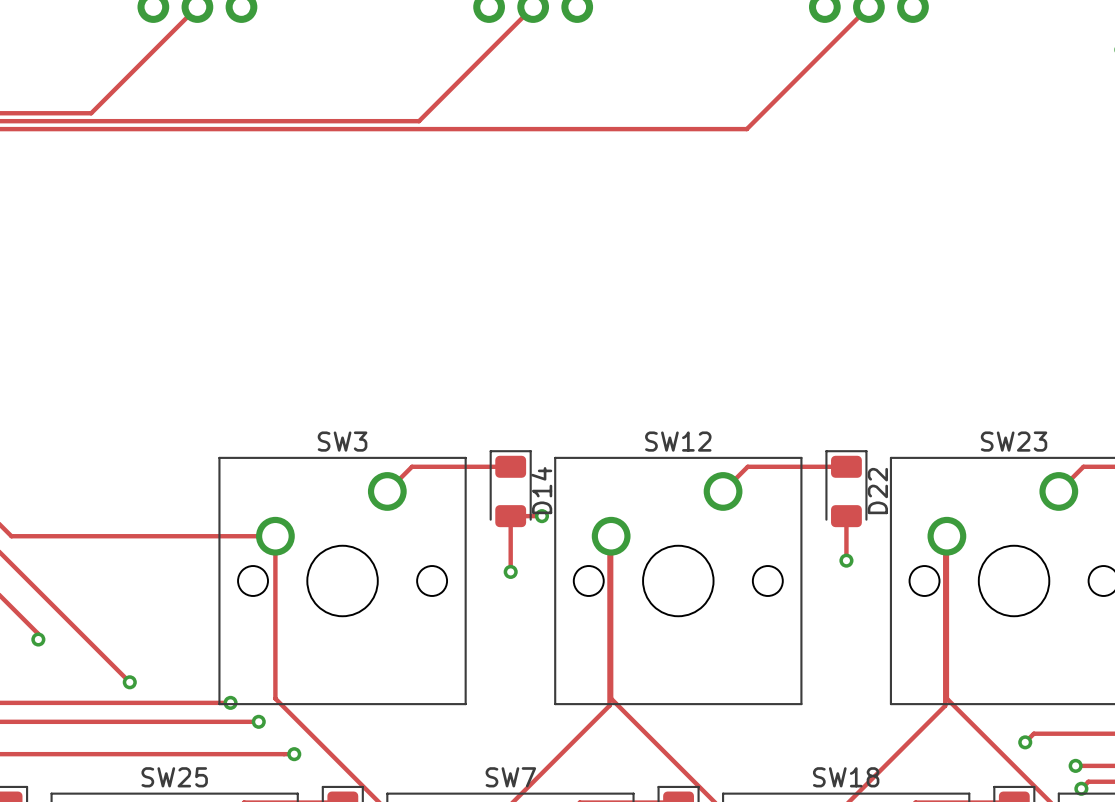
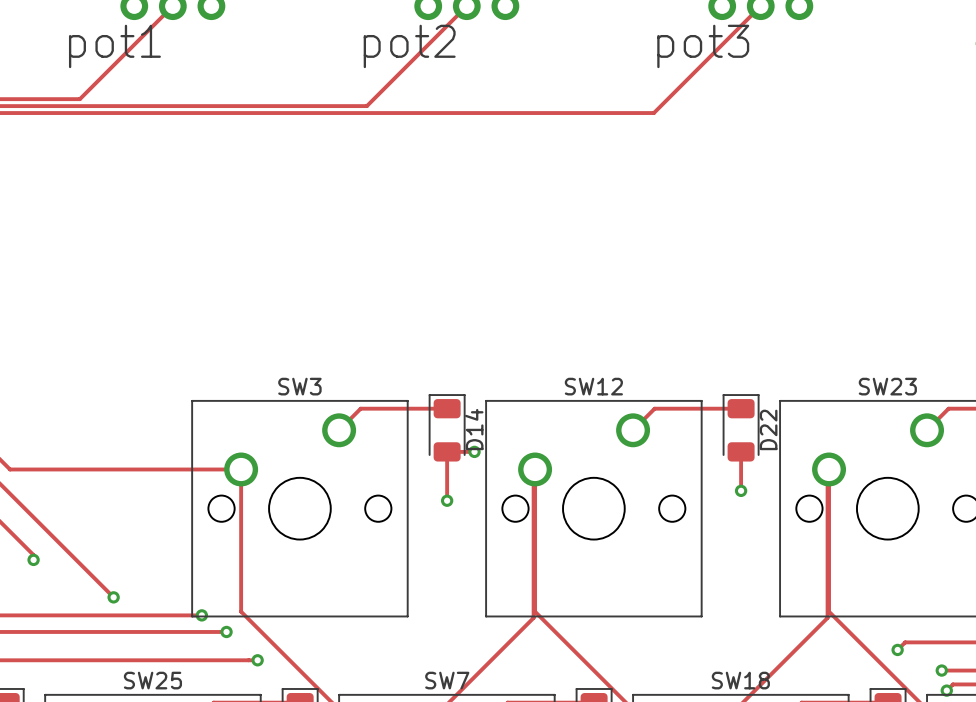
text: none -> pot1 (114, 46)
text: none -> pot2 (409, 46)
text: none -> pot3 (703, 46)

